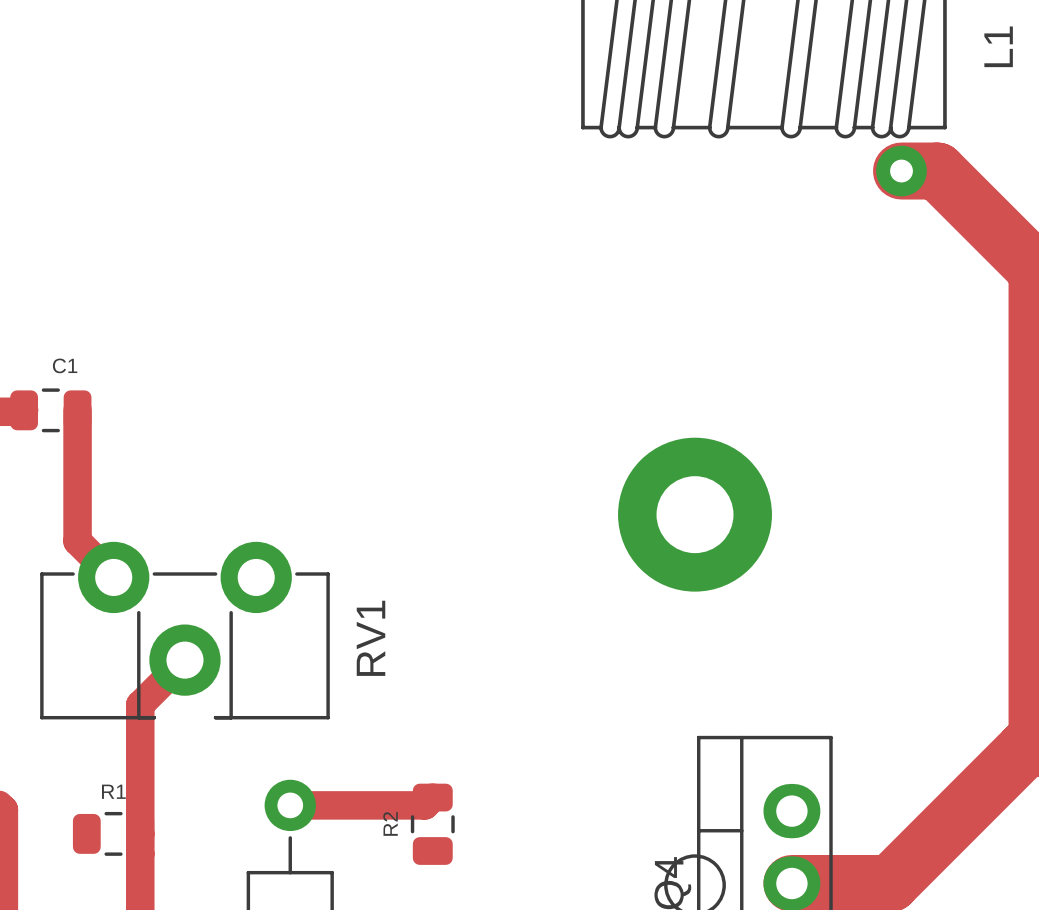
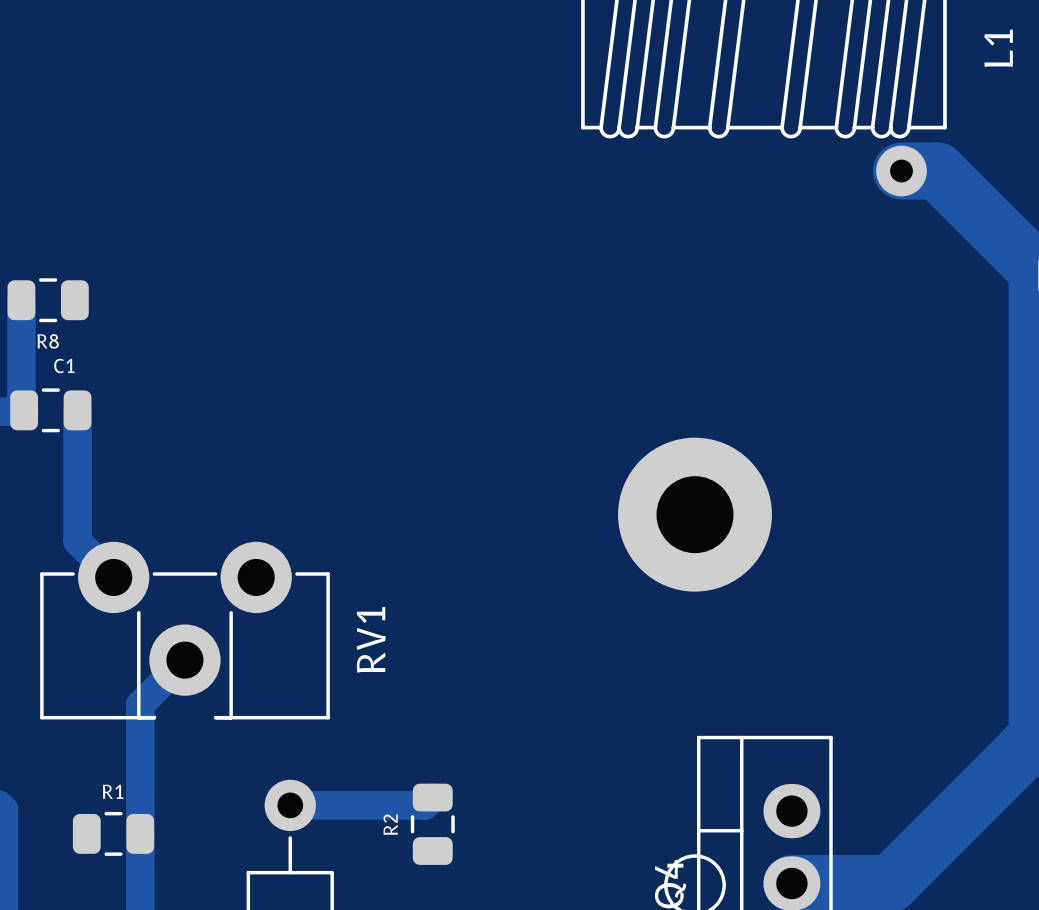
track: none -> (21, 300) (21, 407) (24, 410)
R8: none -> (48, 300)

